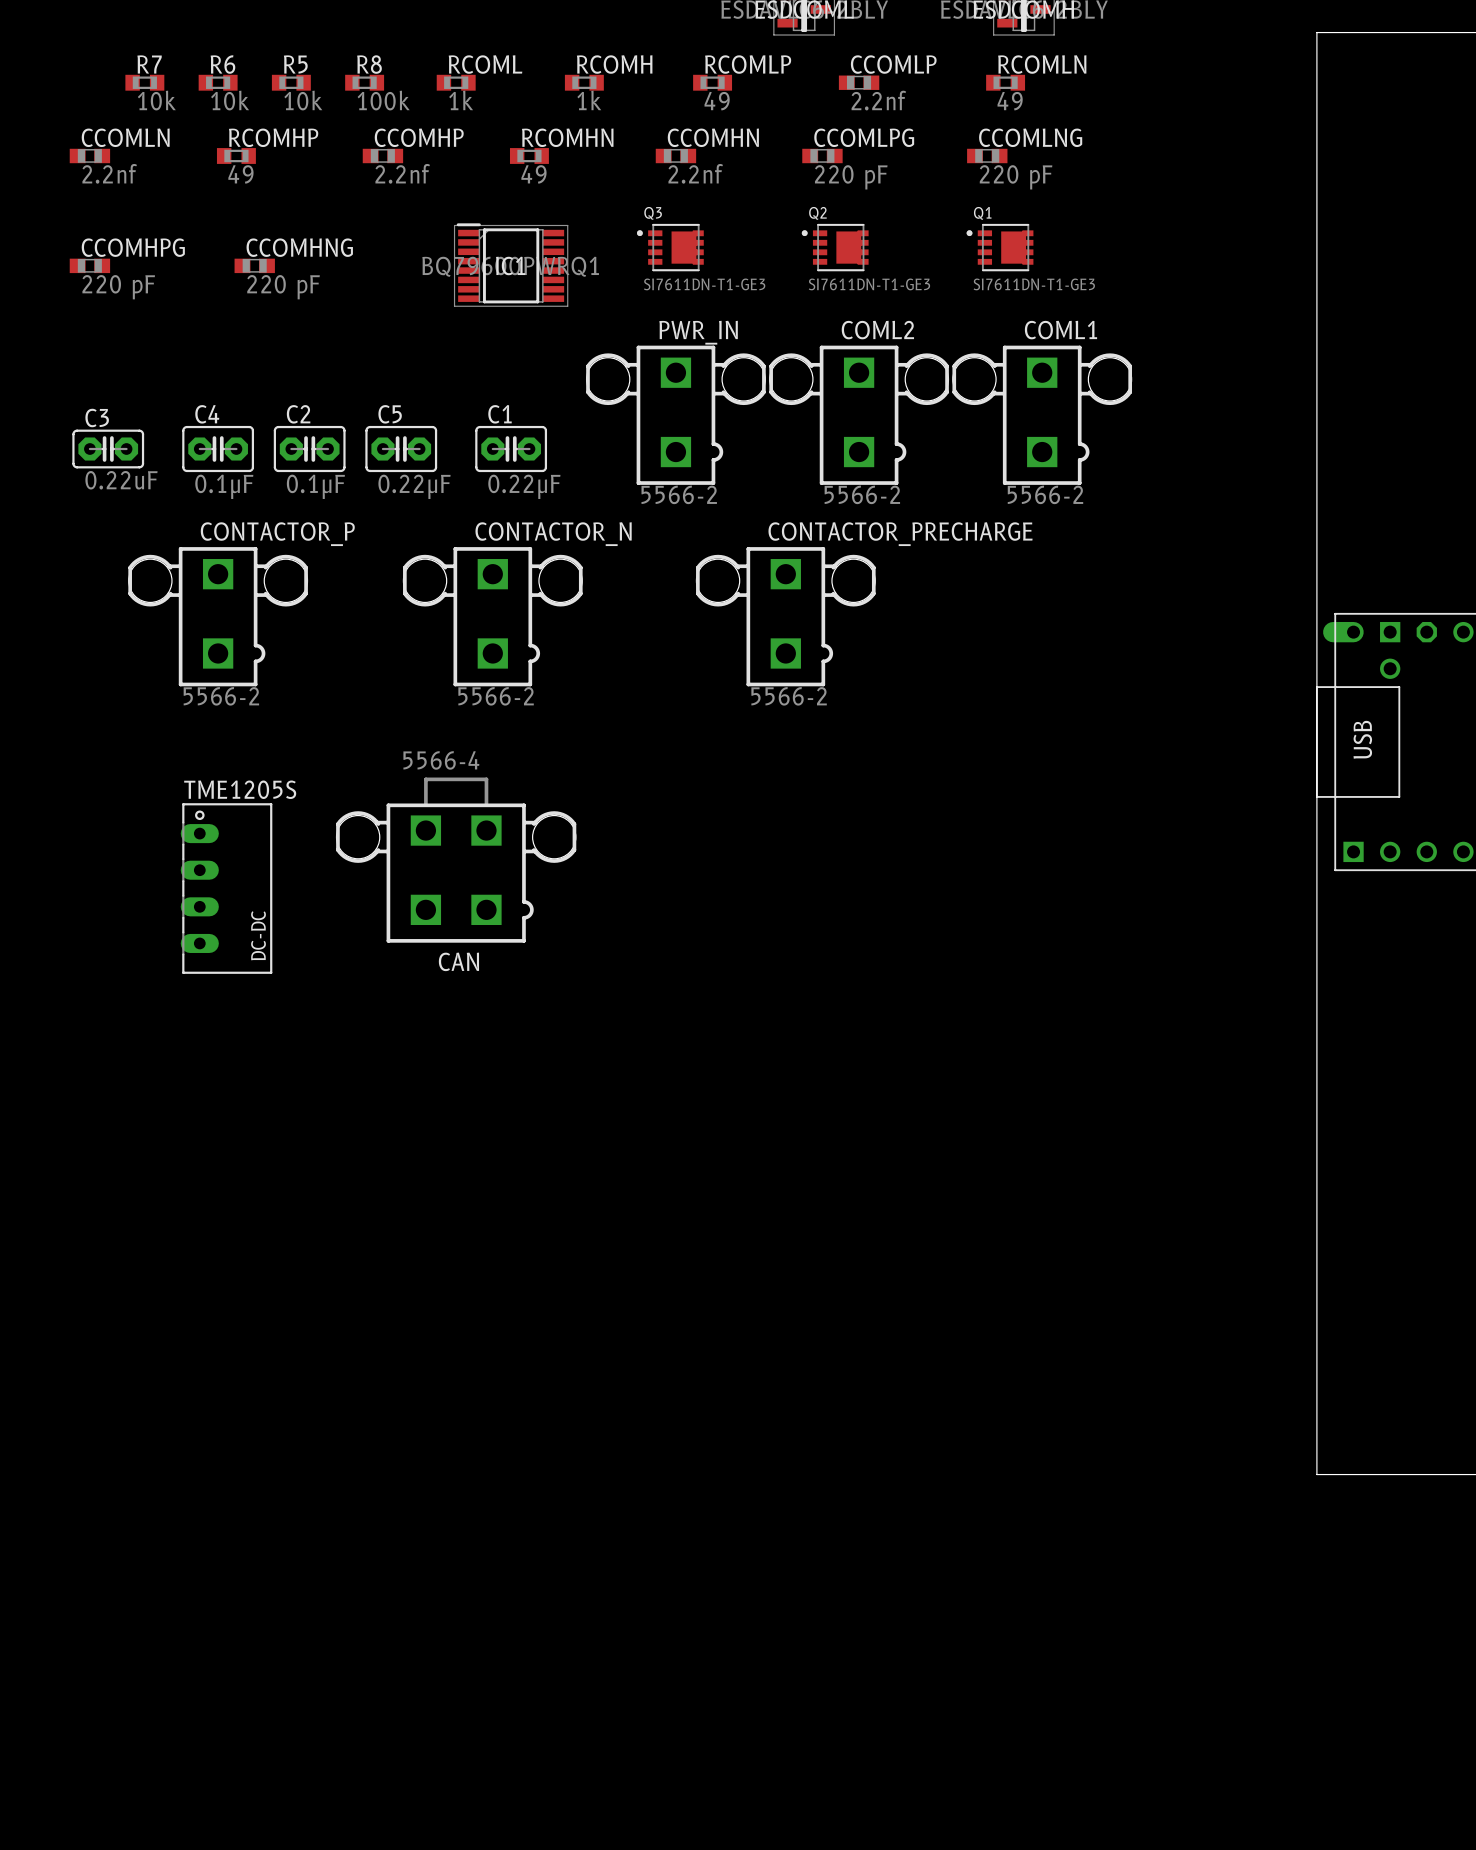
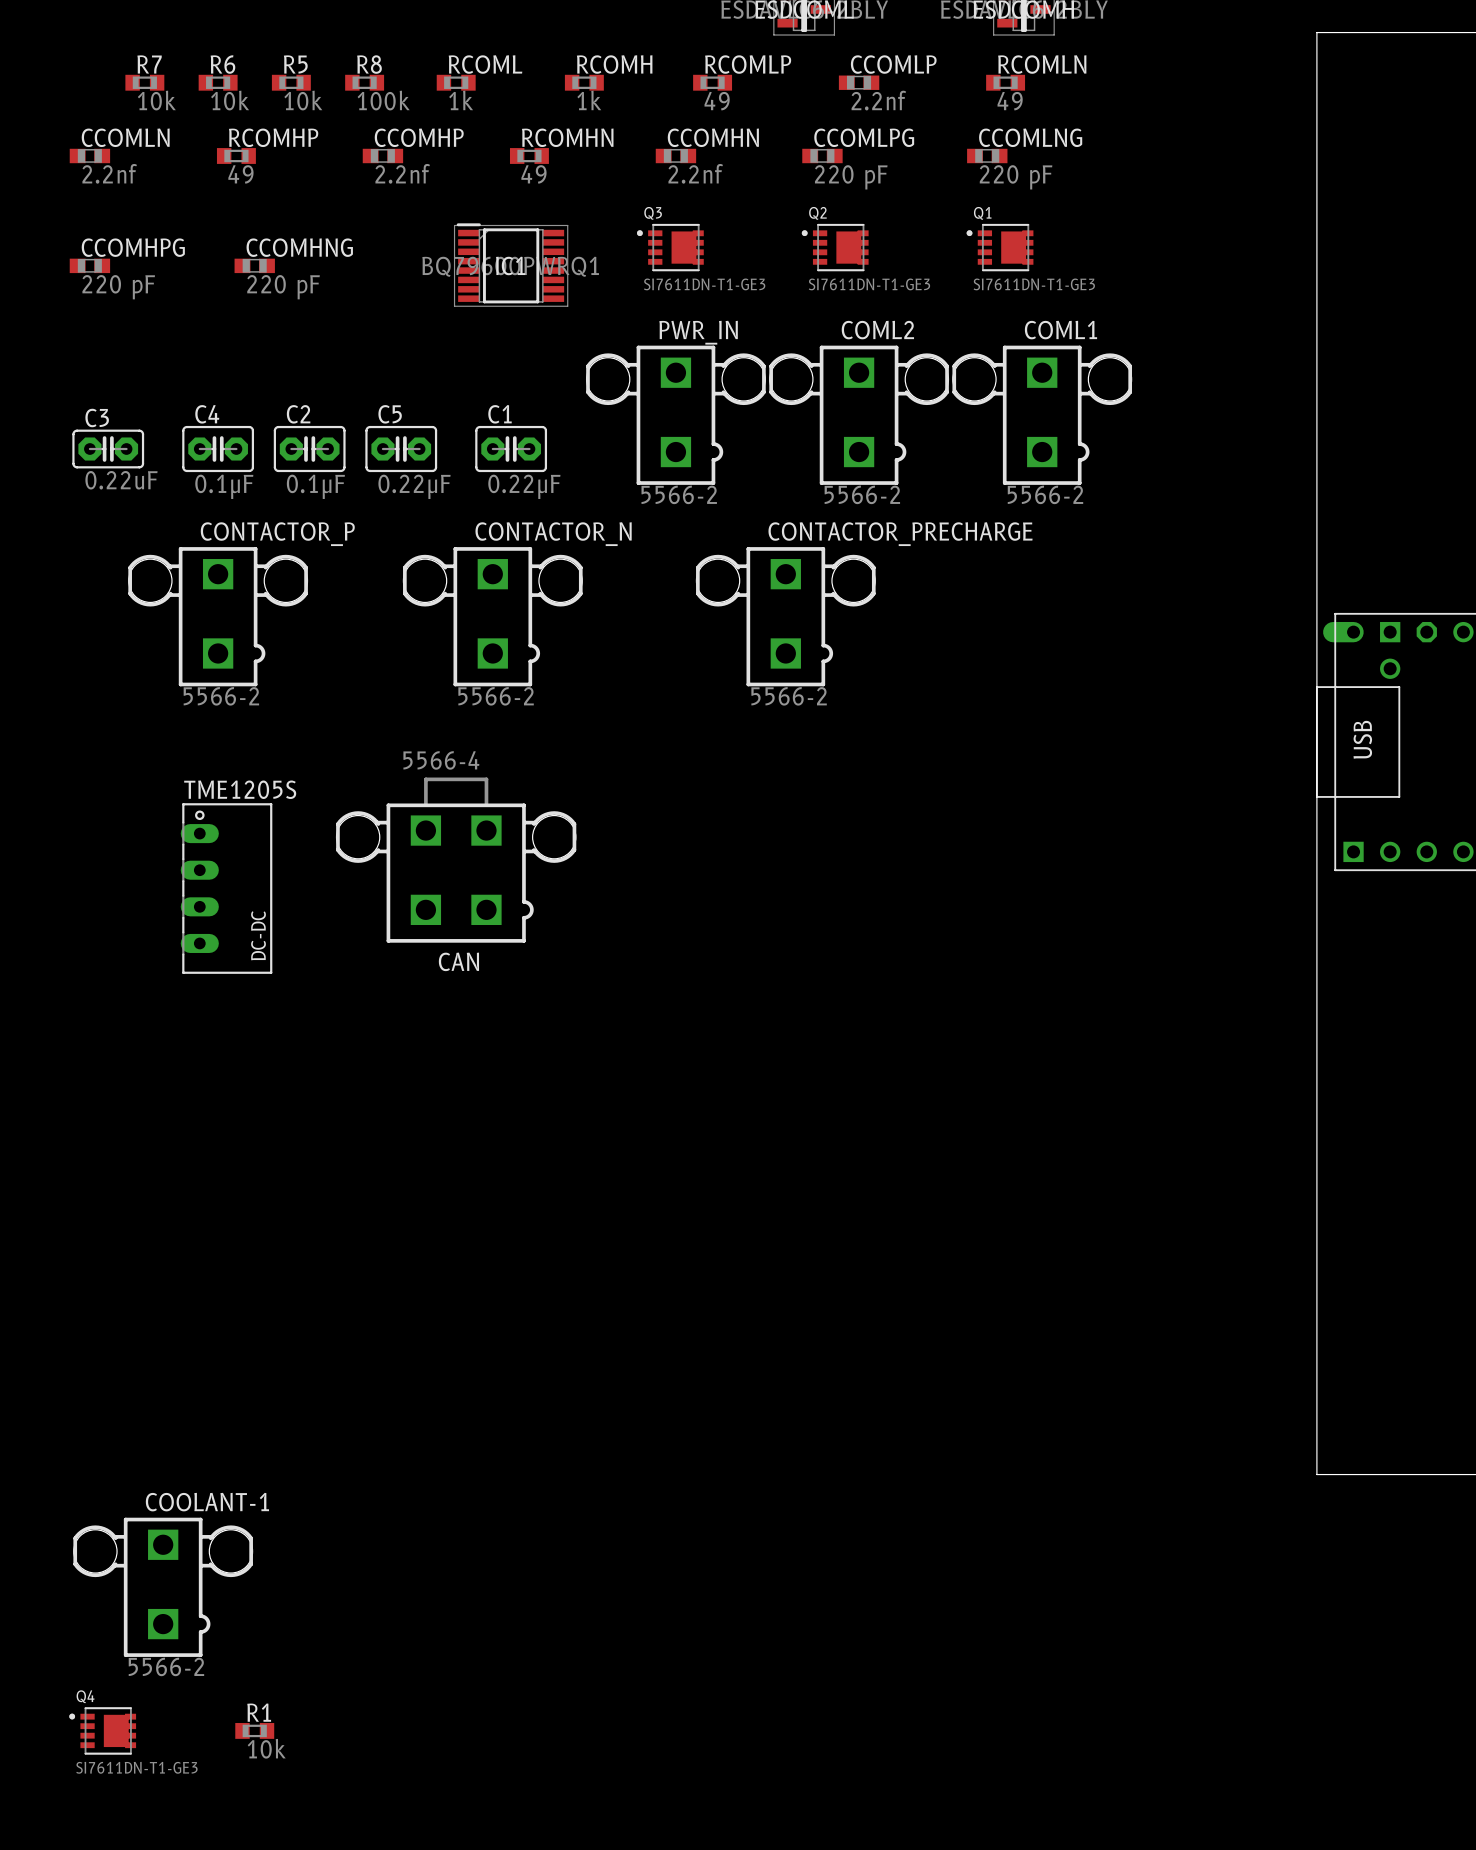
COOLANT-1: none -> 5566-2 (163, 1587)
Q4: none -> SI7611DN-T1-GE3 (102, 1730)
R1: none -> 10k (254, 1730)

